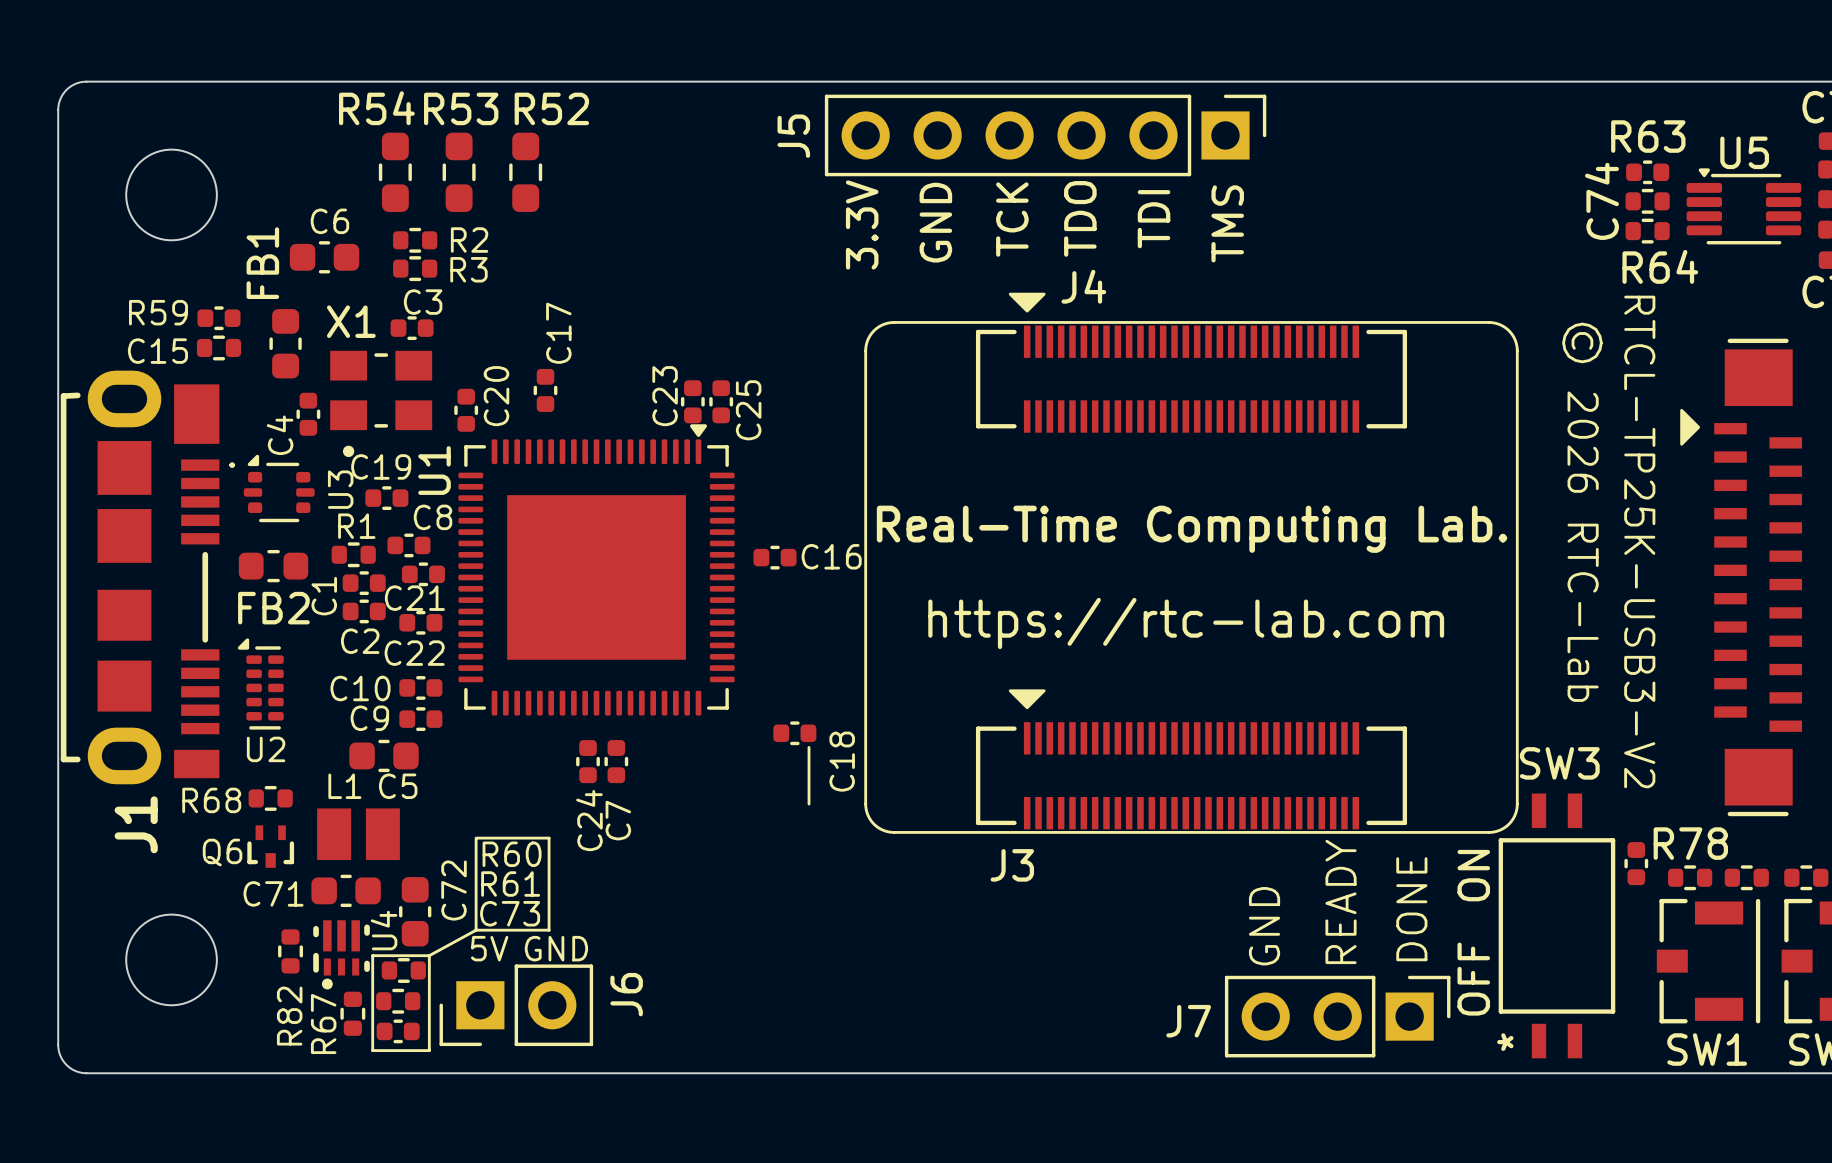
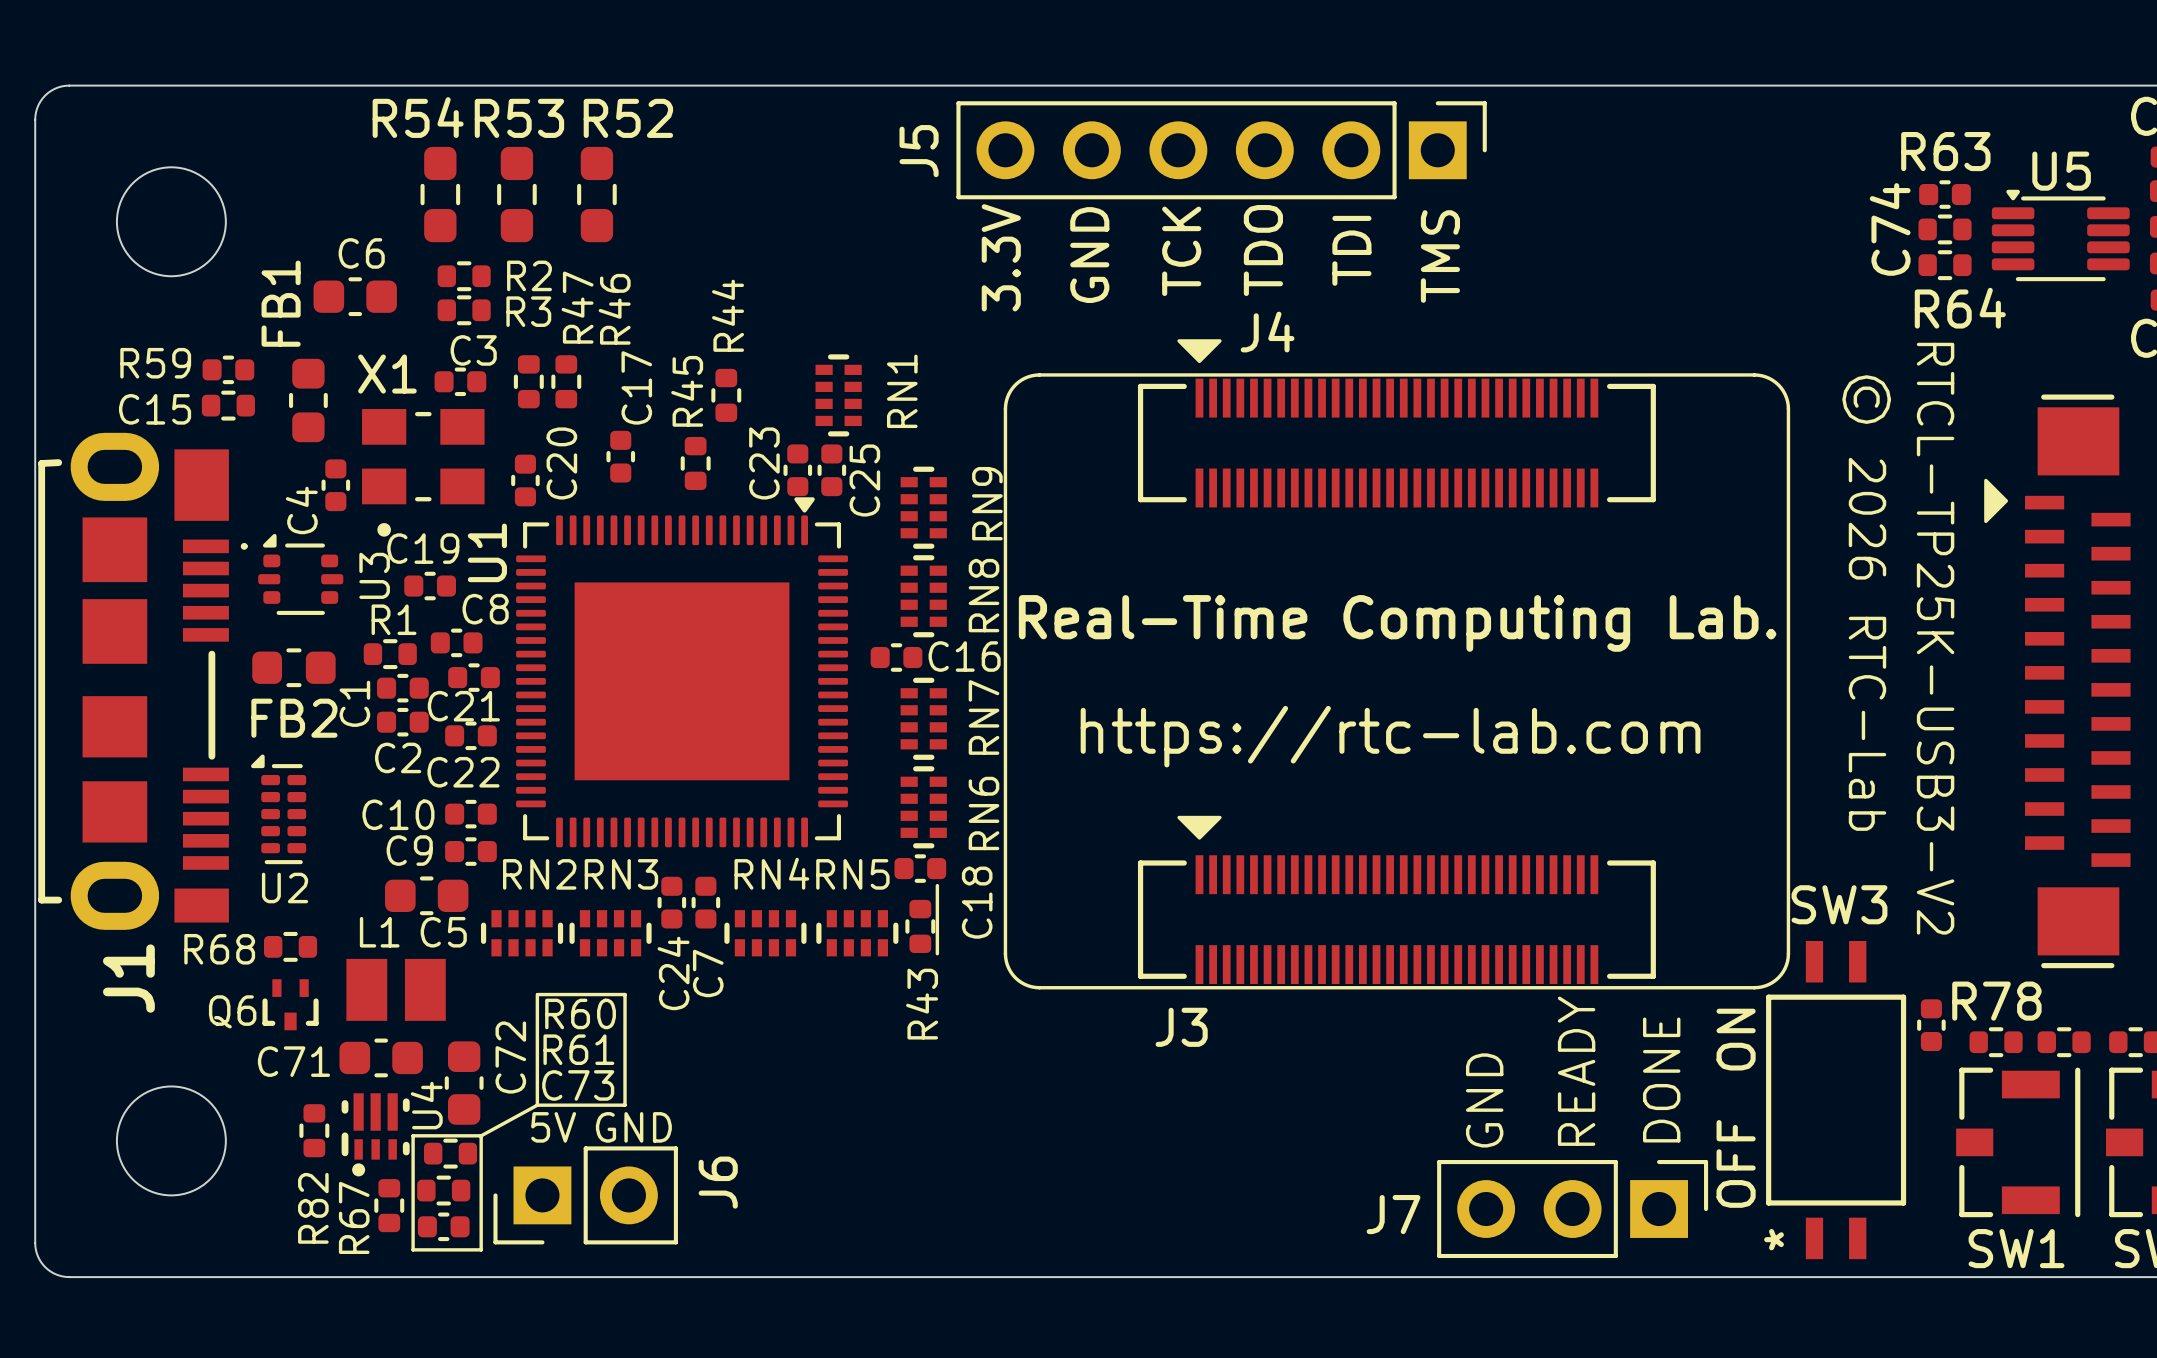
R47: none -> (528, 381)
R46: none -> (566, 381)
R44: none -> (726, 395)
RN1: none -> (838, 395)
R45: none -> (695, 463)
RN9: none -> (923, 507)
RN8: none -> (923, 596)
RN7: none -> (923, 718)
RN6: none -> (923, 807)
R43: none -> (920, 926)
RN2: none -> (522, 933)
RN3: none -> (610, 933)
RN4: none -> (765, 933)
RN5: none -> (857, 933)

